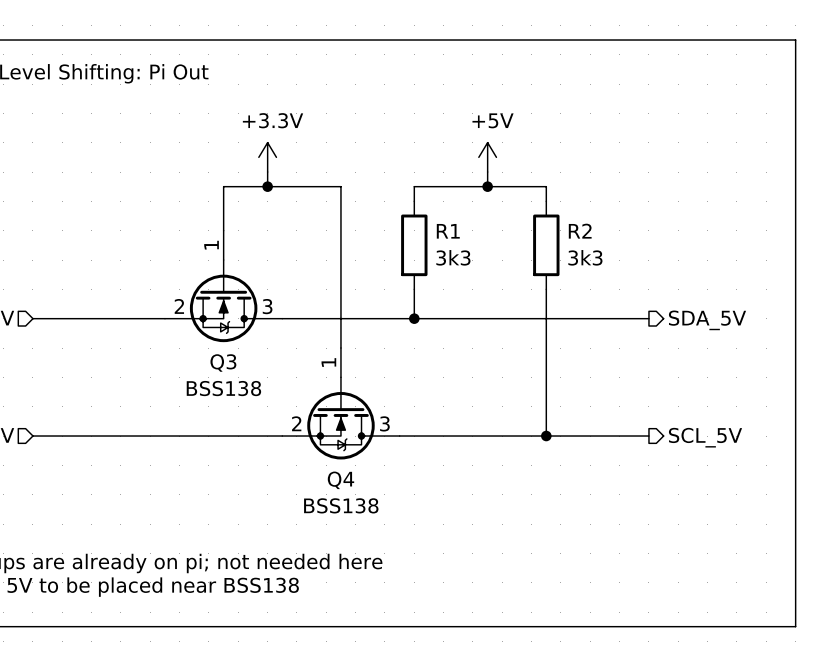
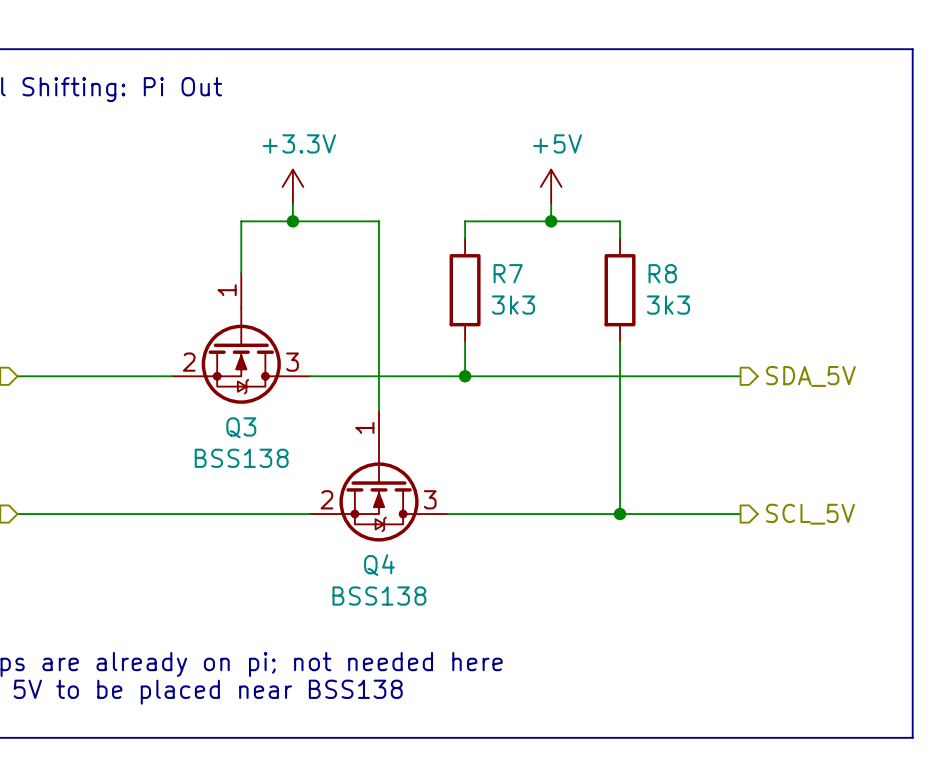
R1 name: R1 (448, 231) -> R7 (508, 273)
R2 name: R2 (580, 231) -> R8 (662, 273)

